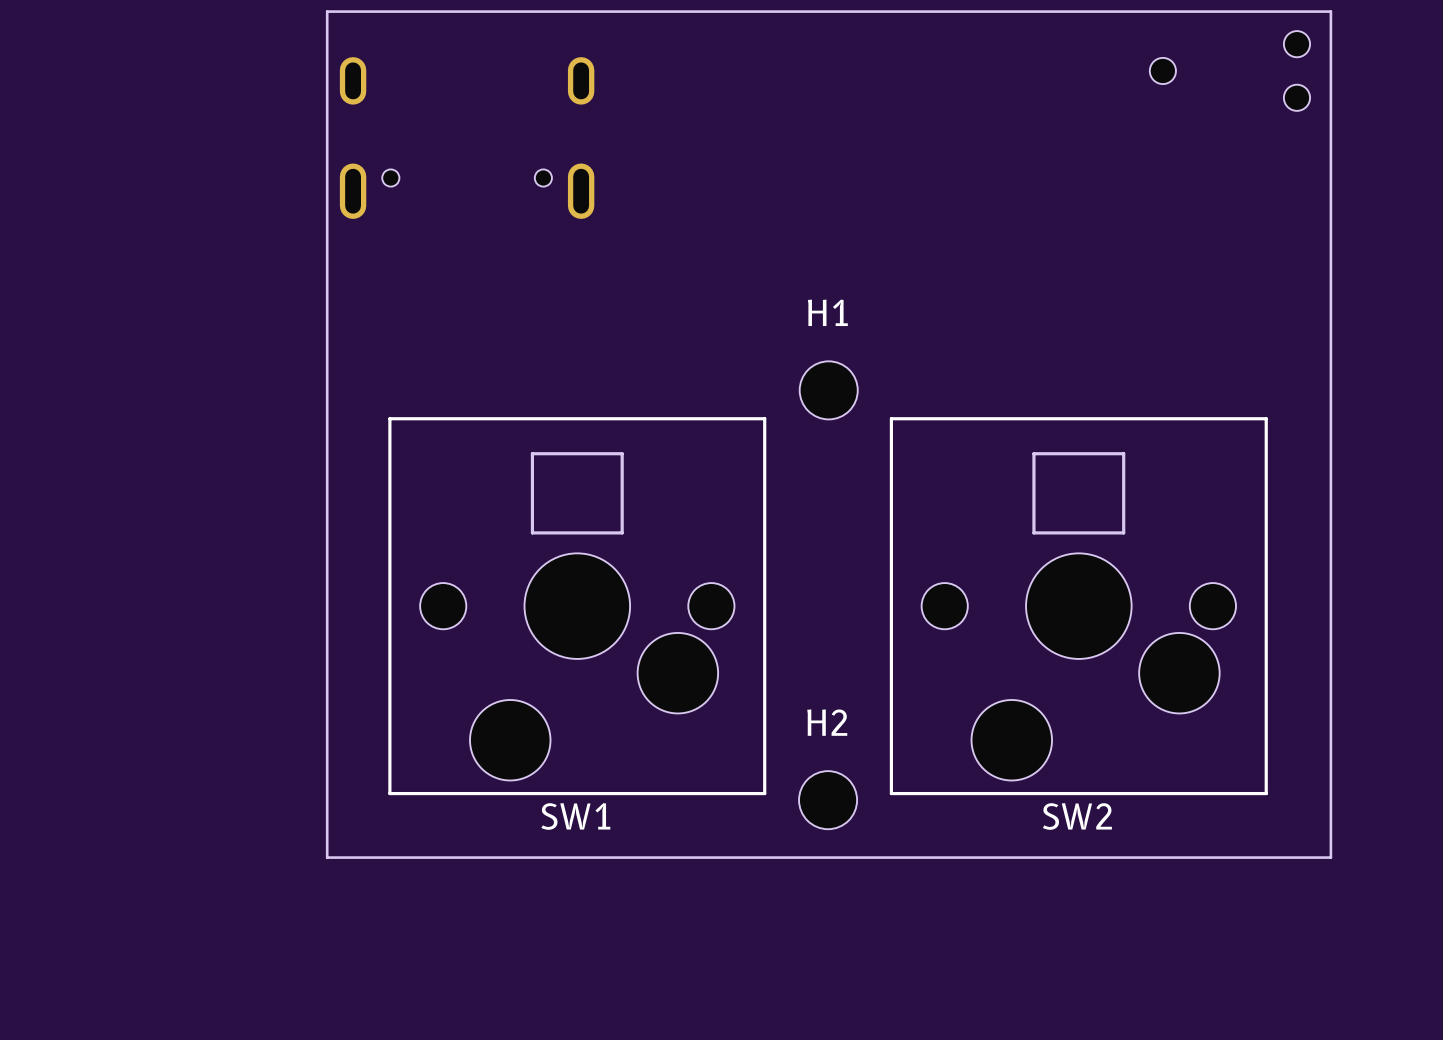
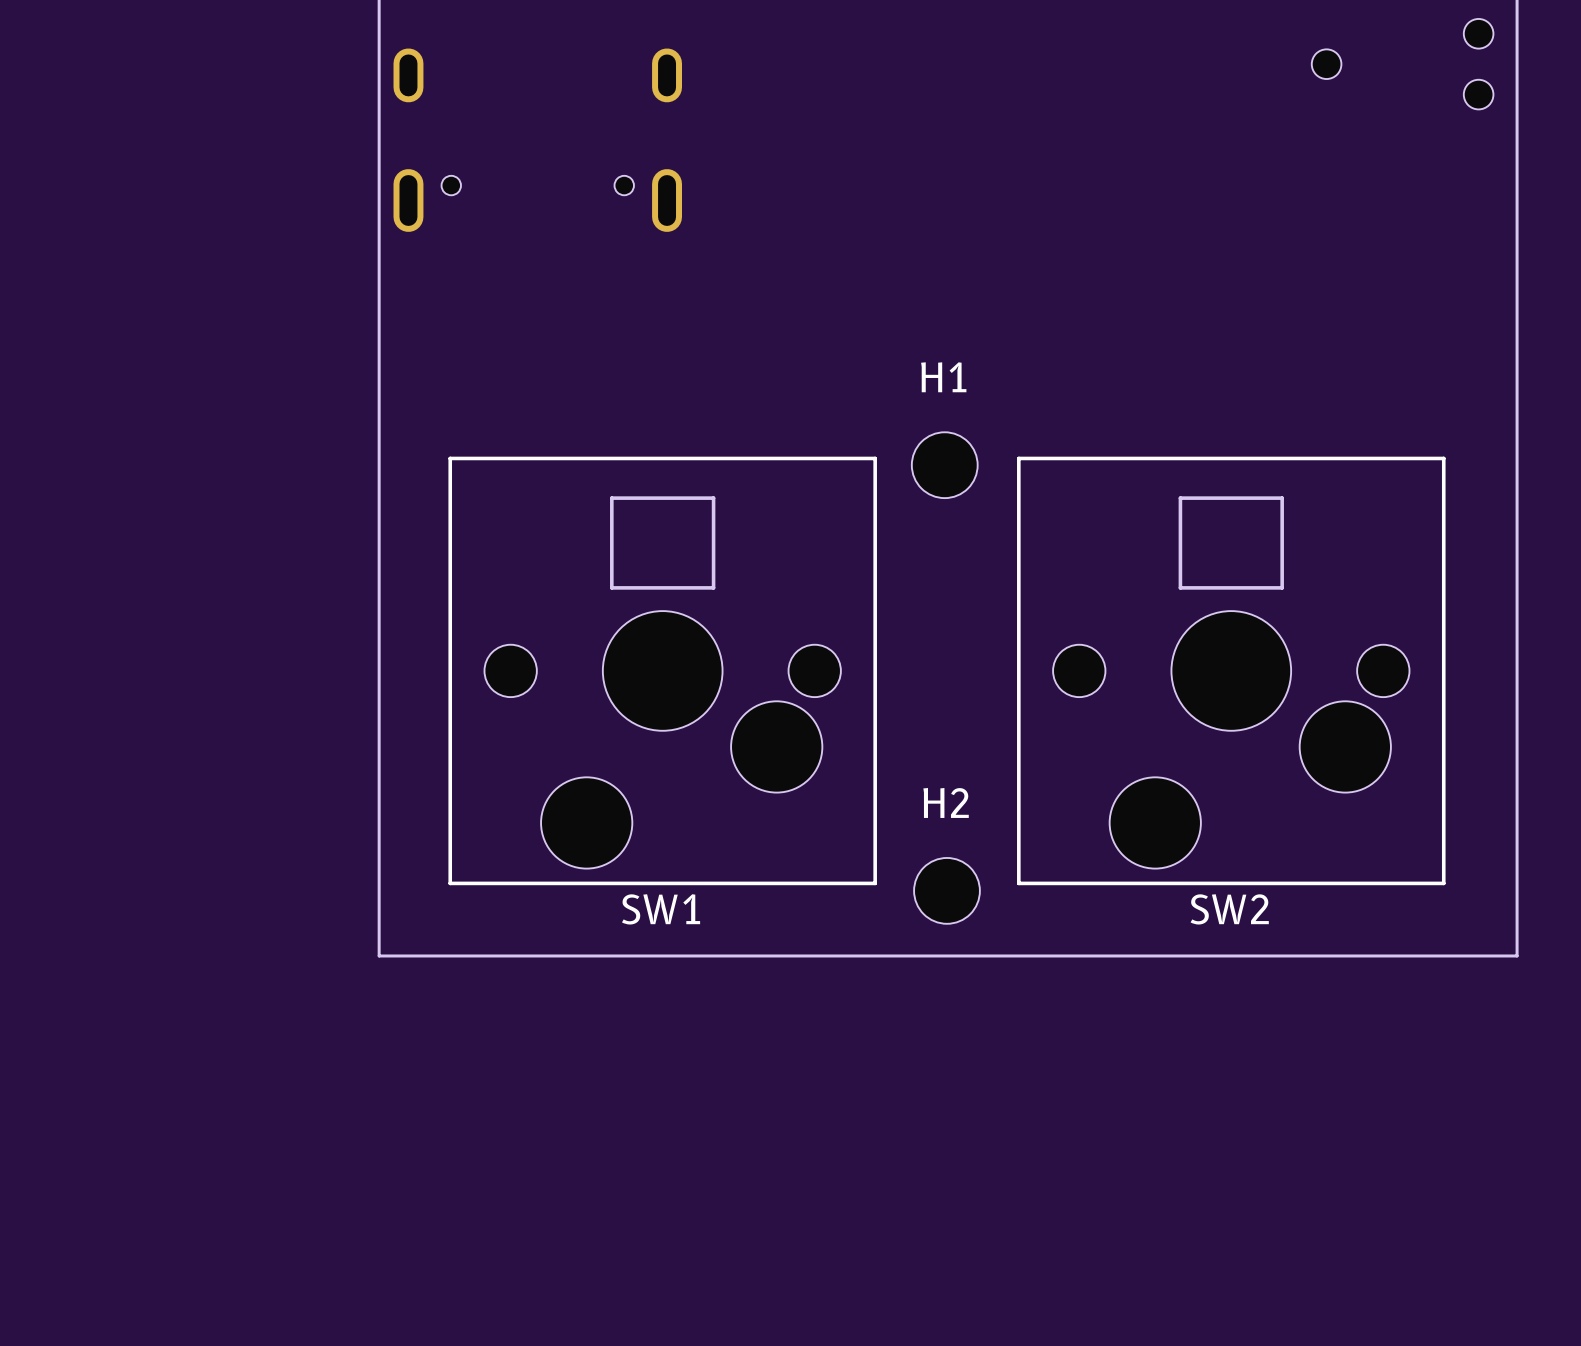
H1 position: (828, 390) -> (944, 465)

